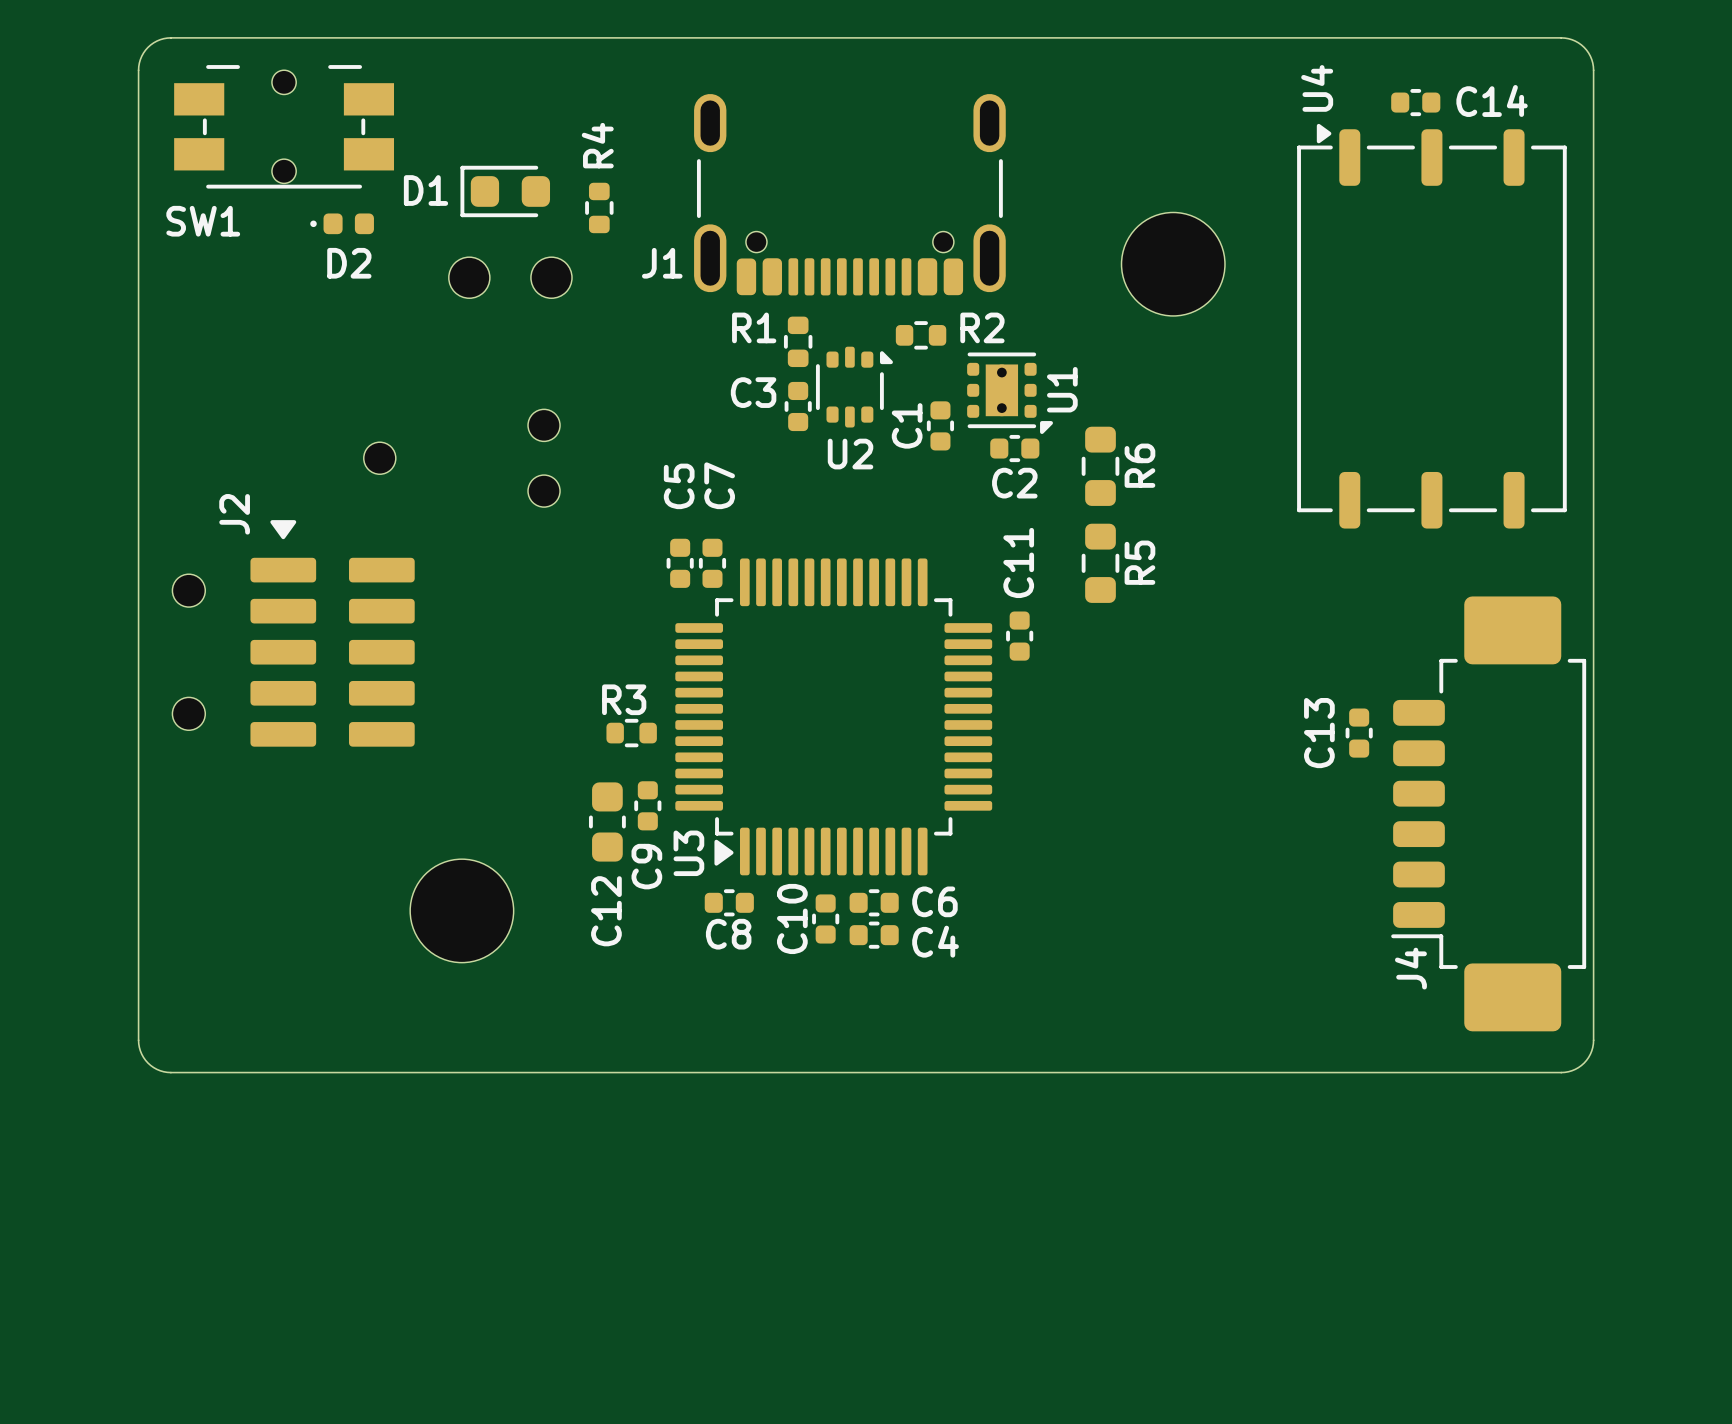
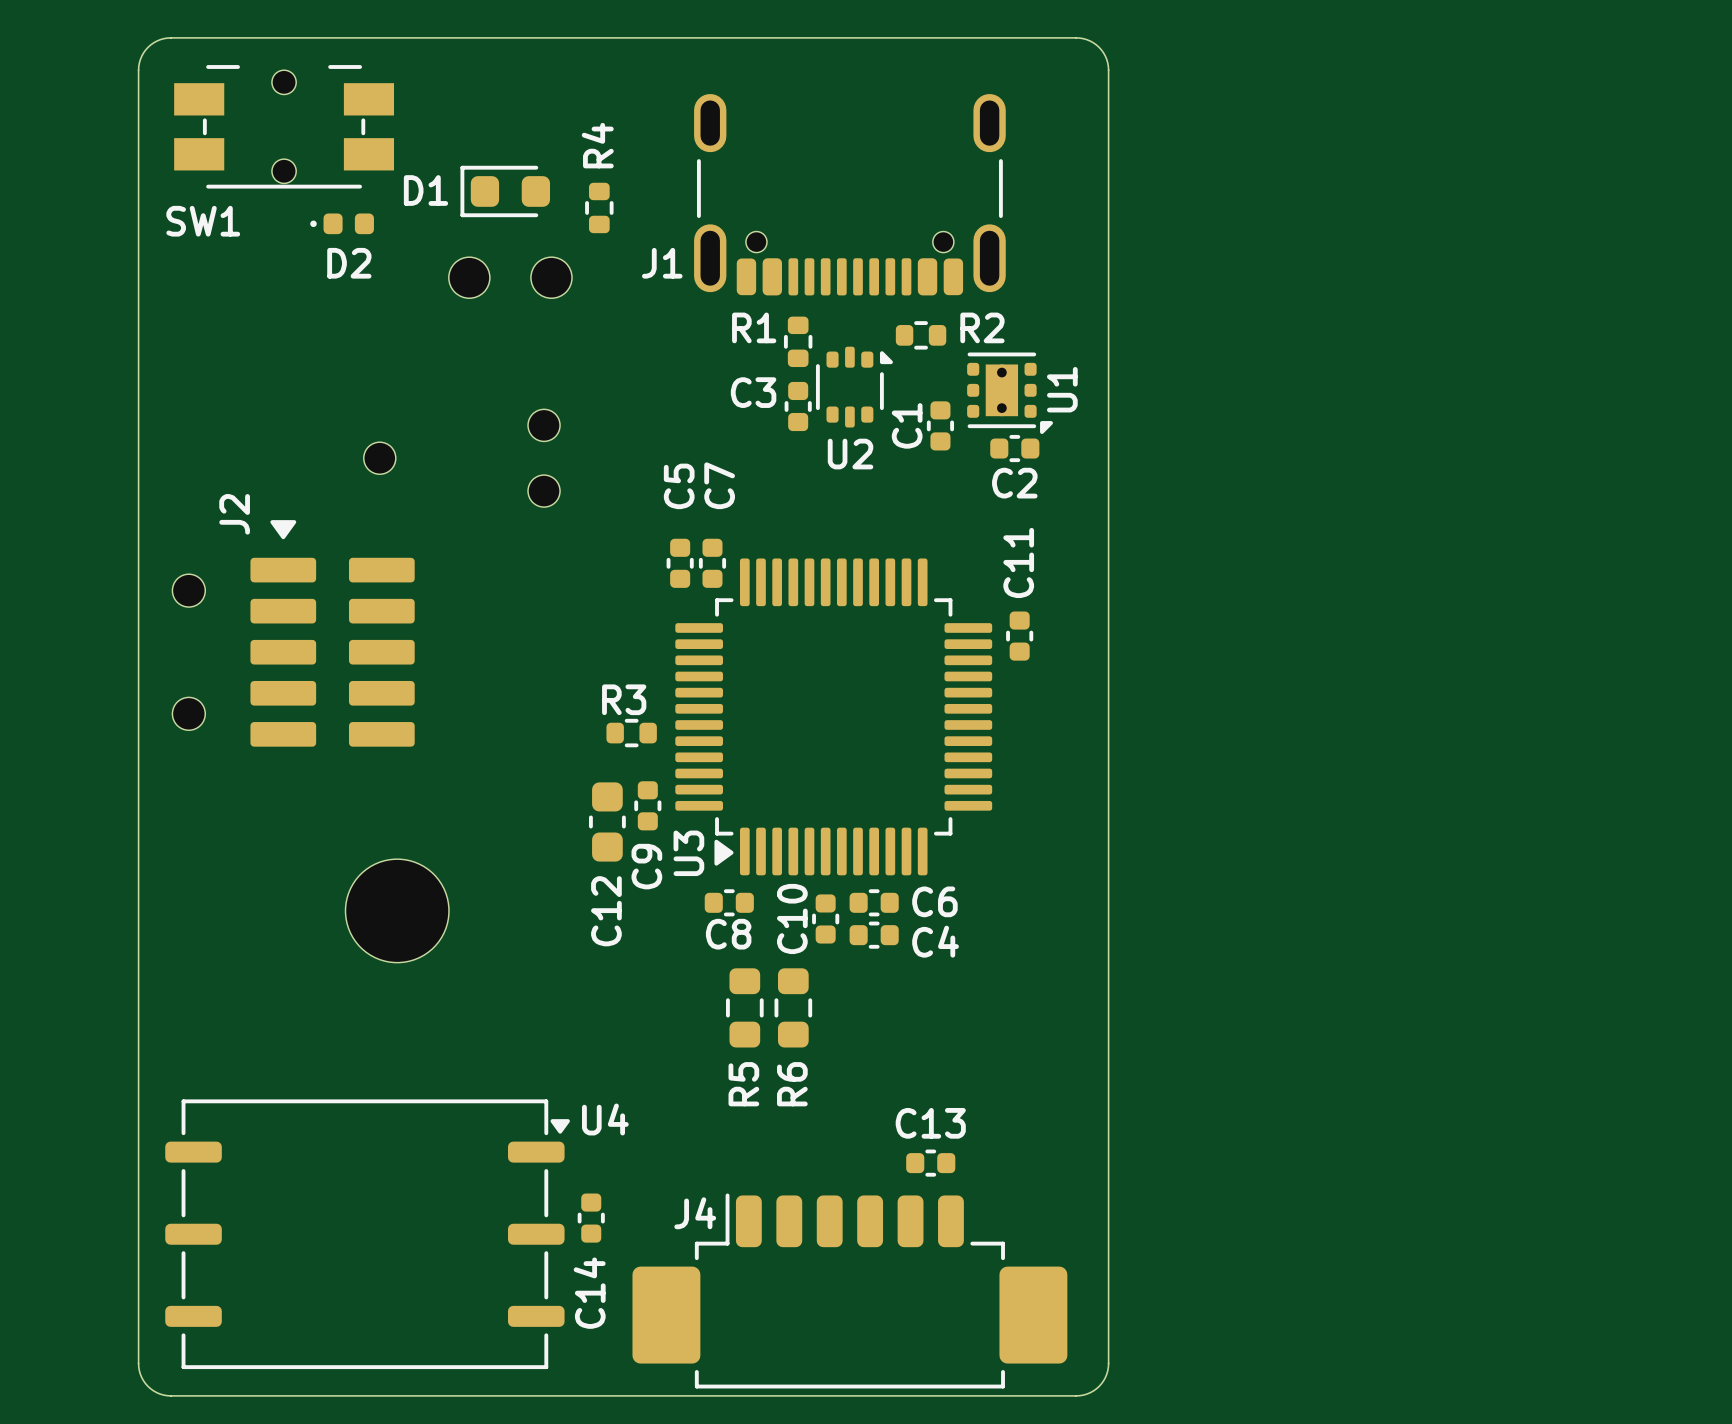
board edge: (1076, 37) (1561, 37) (1578, 42) (1590, 56) (1593, 70) (1593, 1040) (1591, 1050) (1584, 1063) (1575, 1069) (1561, 1072) (170, 1072) (156, 1069) (148, 1063) (141, 1054) (138, 1040) -> (1076, 37) (1086, 39) (1099, 47) (1105, 56) (1108, 70) (1108, 1363) (1106, 1374) (1099, 1386) (1086, 1394) (1076, 1395) (170, 1395) (160, 1394) (145, 1383) (138, 1367) (138, 1040)
C14 rotation: 0° (1415, 102) -> 90° clockwise (591, 1218)
C14 position: (1415, 102) -> (591, 1218)
part: (1173, 264) -> none
U4 rotation: 0° (1431, 326) -> 90° clockwise (367, 1234)
U4 position: (1431, 326) -> (367, 1234)
R6 name position: R6 (1139, 465) -> R6 (792, 1084)
R6 position: (1100, 466) -> (793, 1007)
R5 name position: R5 (1139, 562) -> R5 (743, 1084)
R5 position: (1100, 563) -> (744, 1007)
C13 rotation: 0° (1359, 733) -> 90° clockwise (930, 1163)
C13 position: (1359, 733) -> (930, 1163)
J4 rotation: 0° (1488, 813) -> 90° clockwise (849, 1290)
J4 position: (1488, 813) -> (849, 1290)
part position: (461, 910) -> (397, 910)

